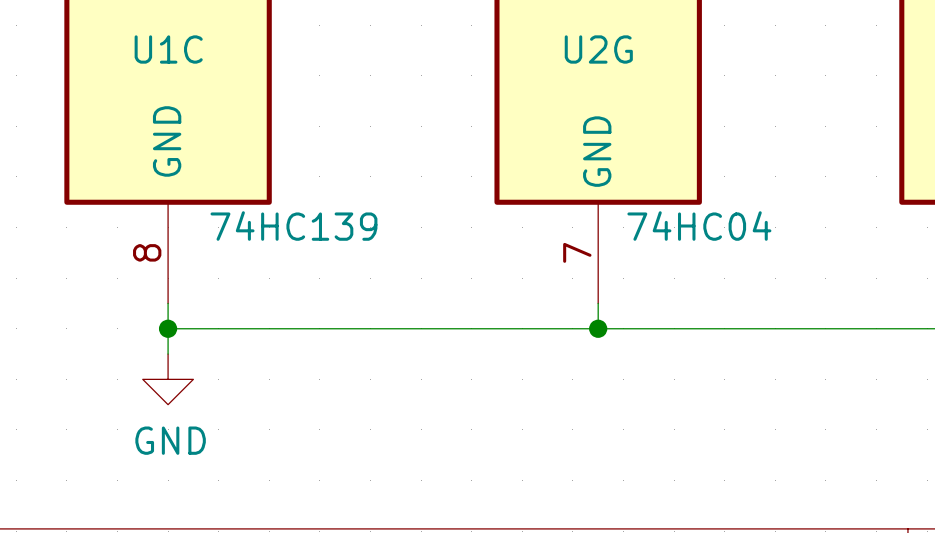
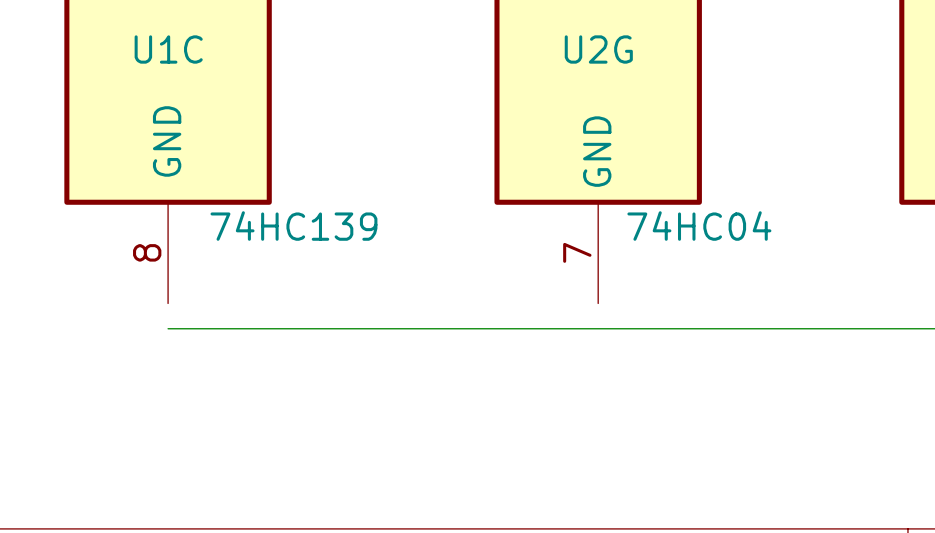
wire: (168, 303) (168, 354) -> none
wire: (598, 303) (598, 328) -> none
junction: (168, 328) -> none
junction: (598, 328) -> none
power symbol: GND (168, 379) -> none

